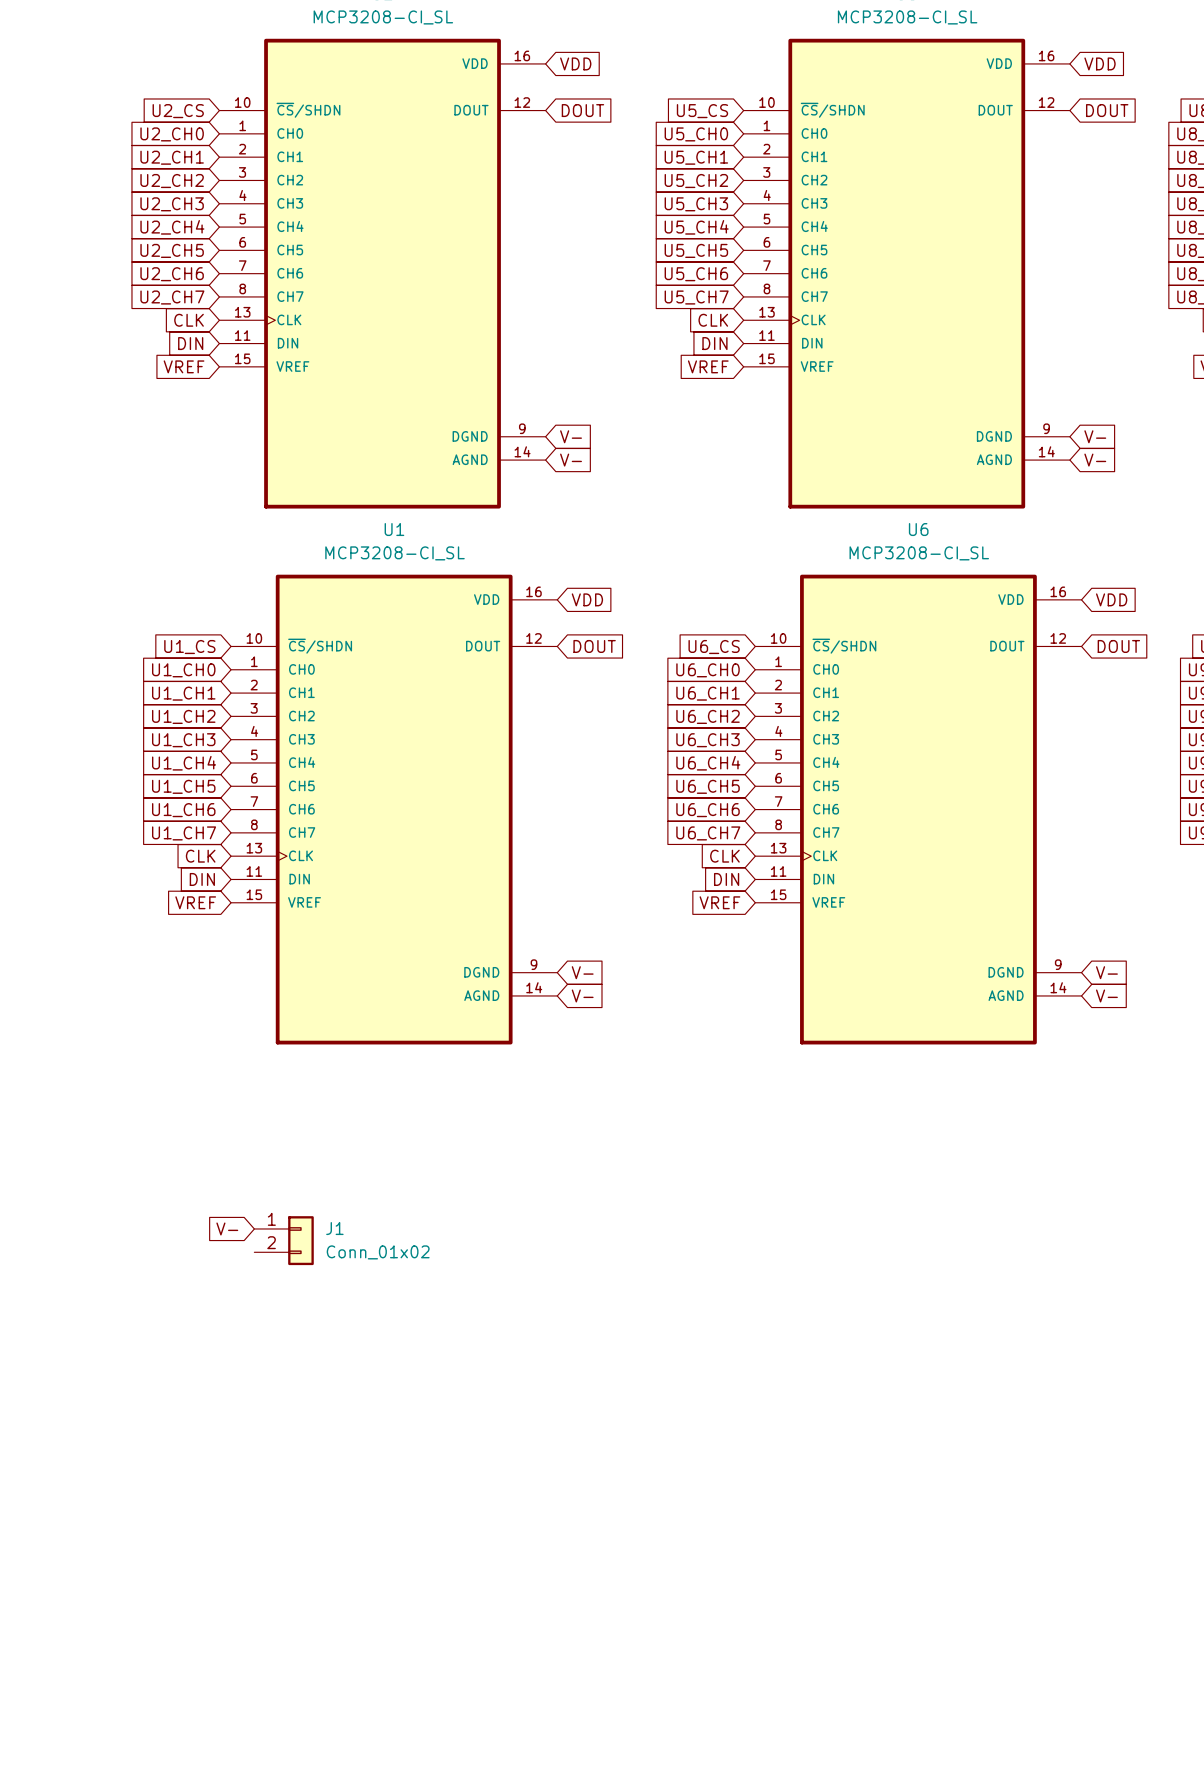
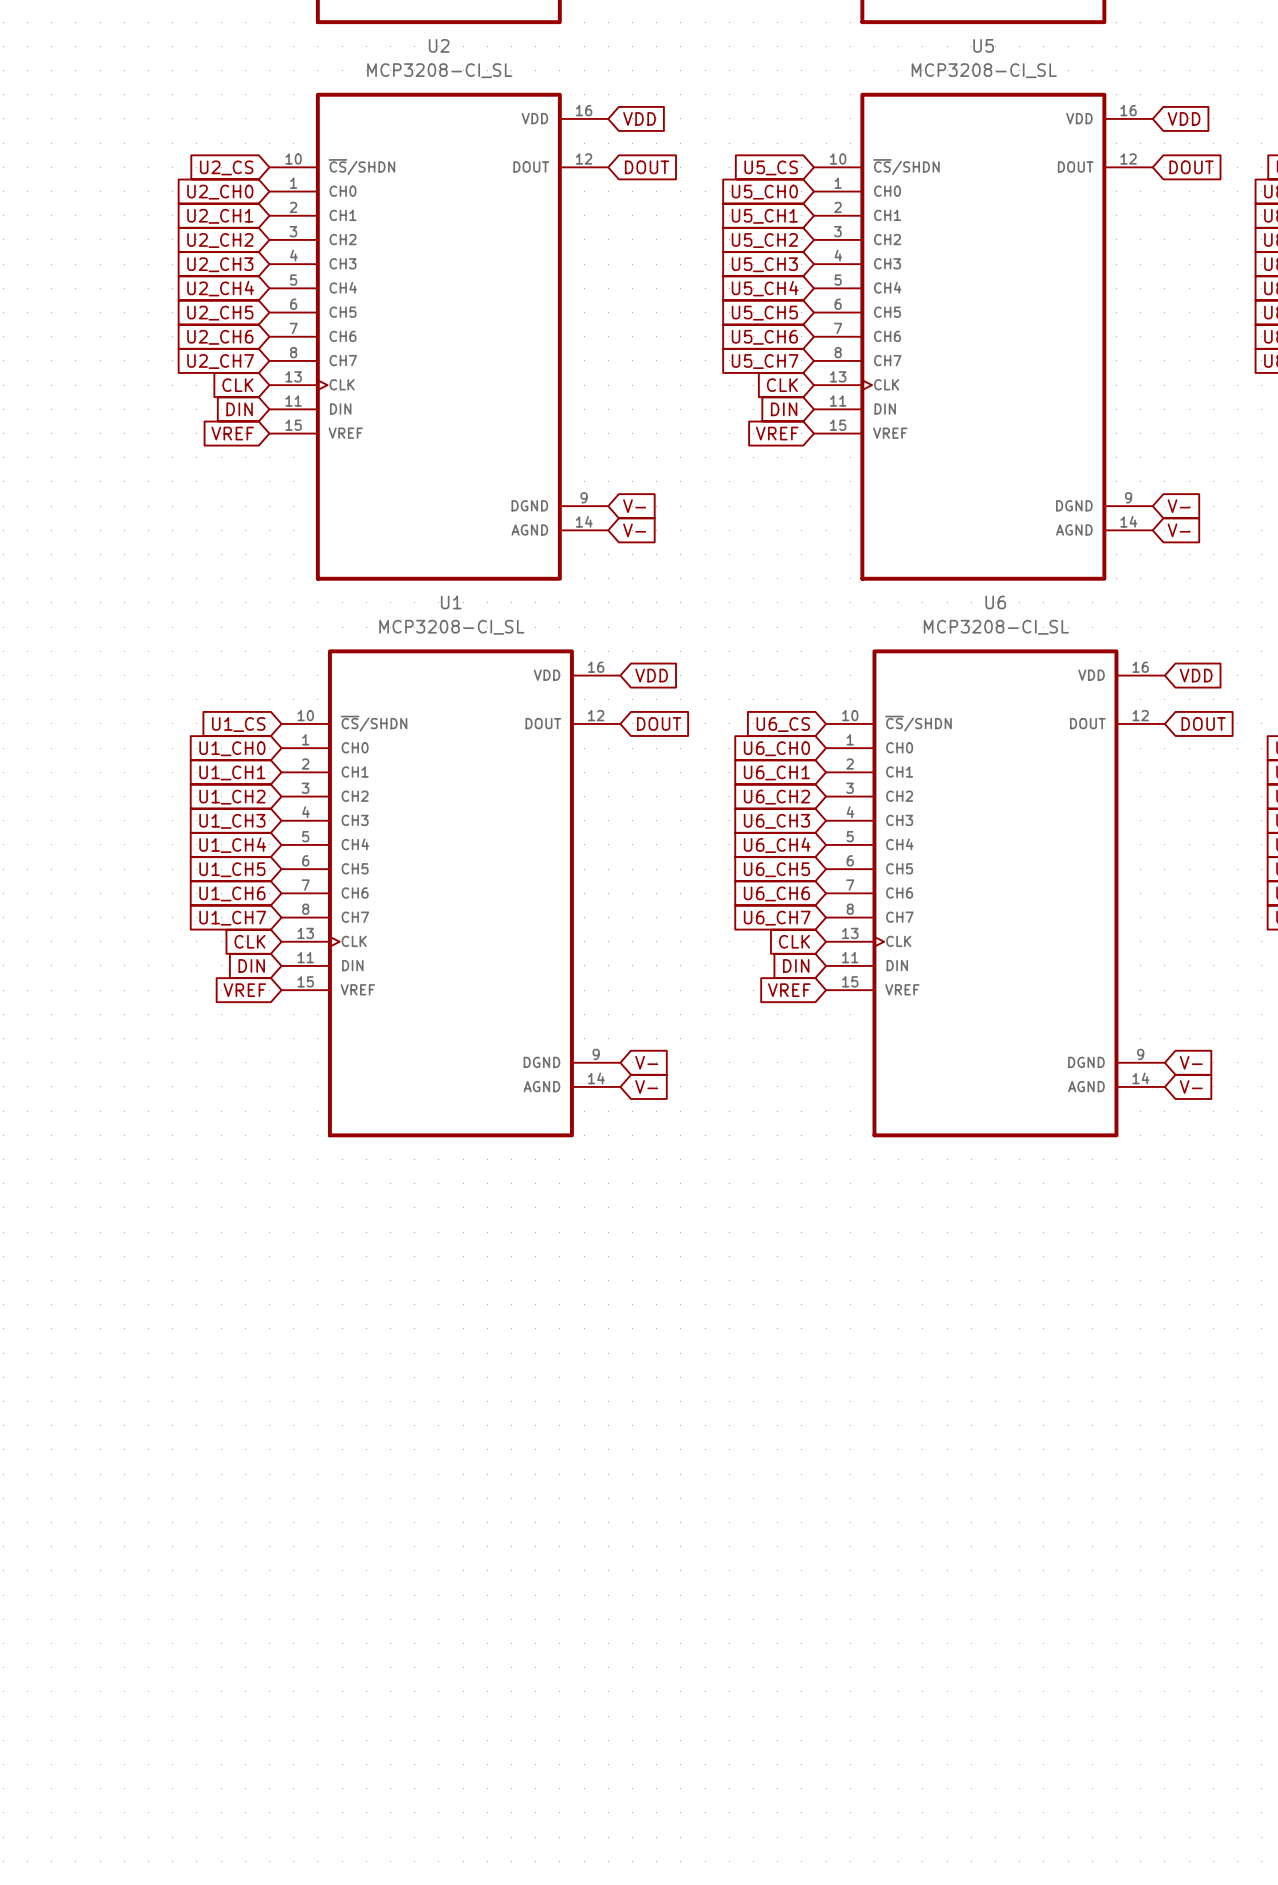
global label: V- (227, 1228) -> none
J1: Conn_01x02 (284, 1240) -> none

